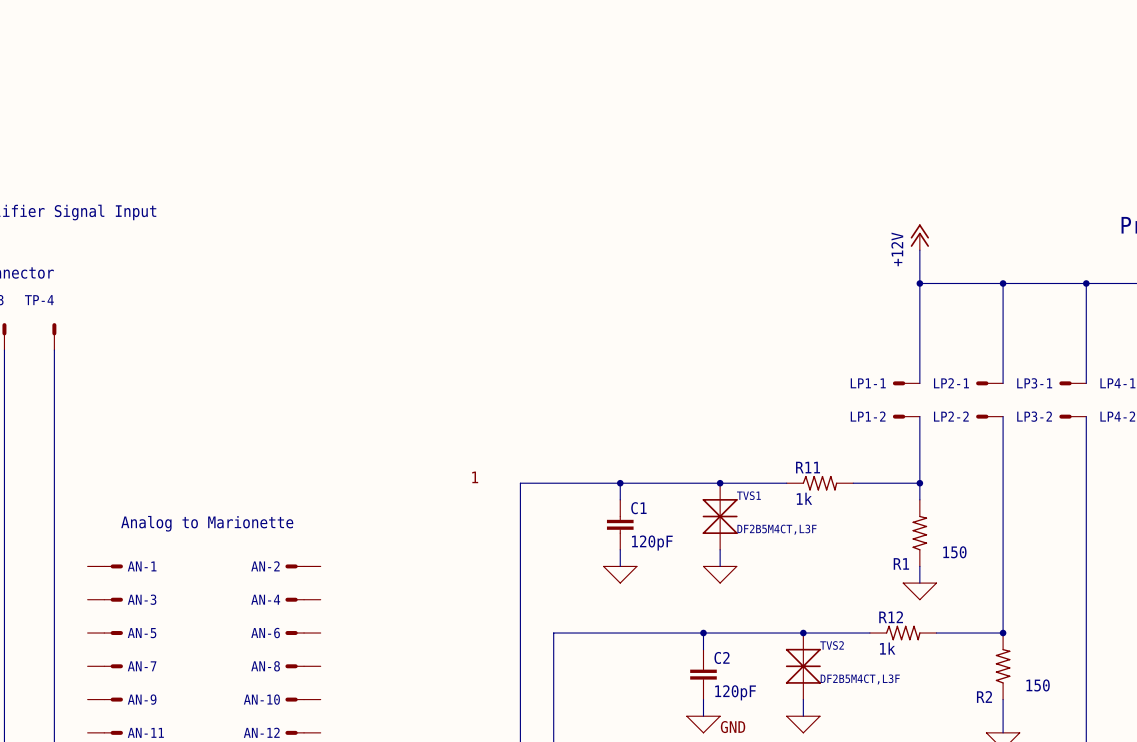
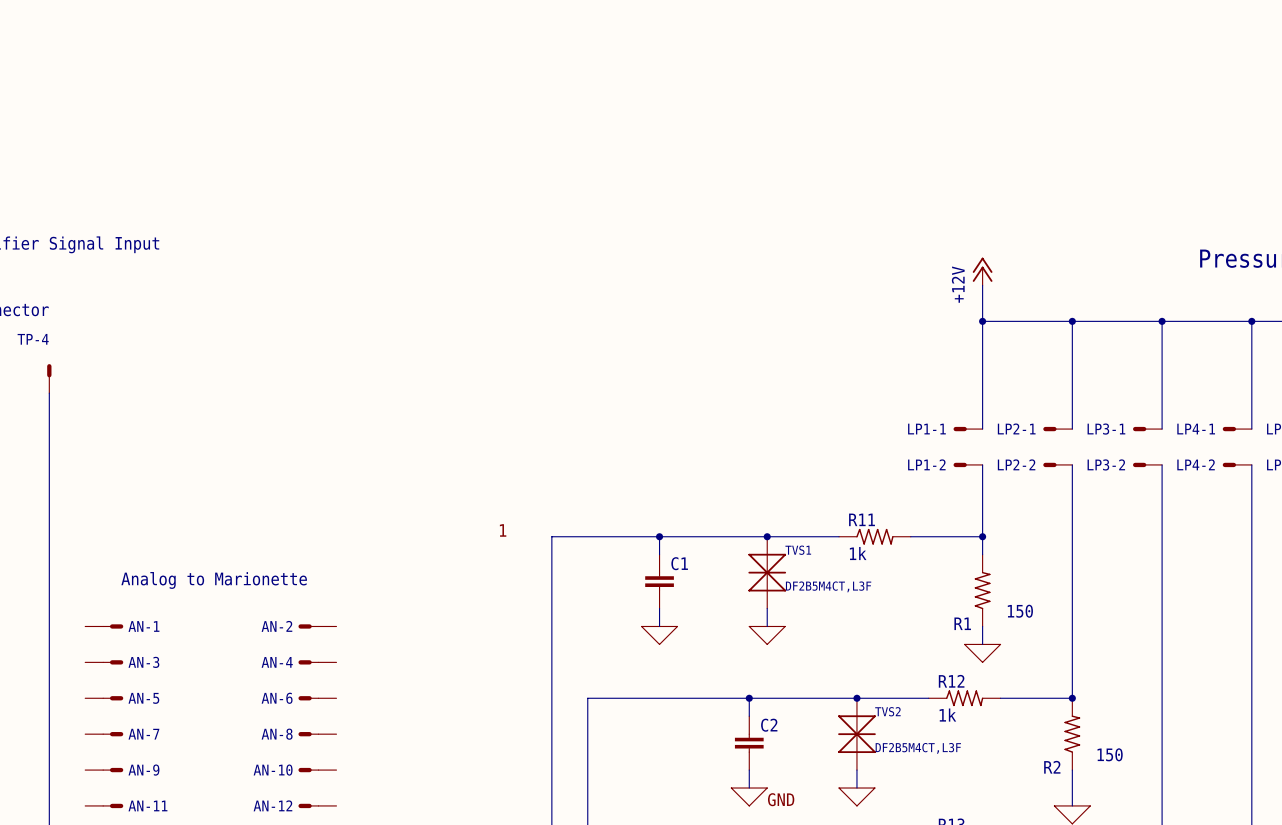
C1 value: 120pF (652, 543) -> none
C2 value: 120pF (735, 692) -> none

